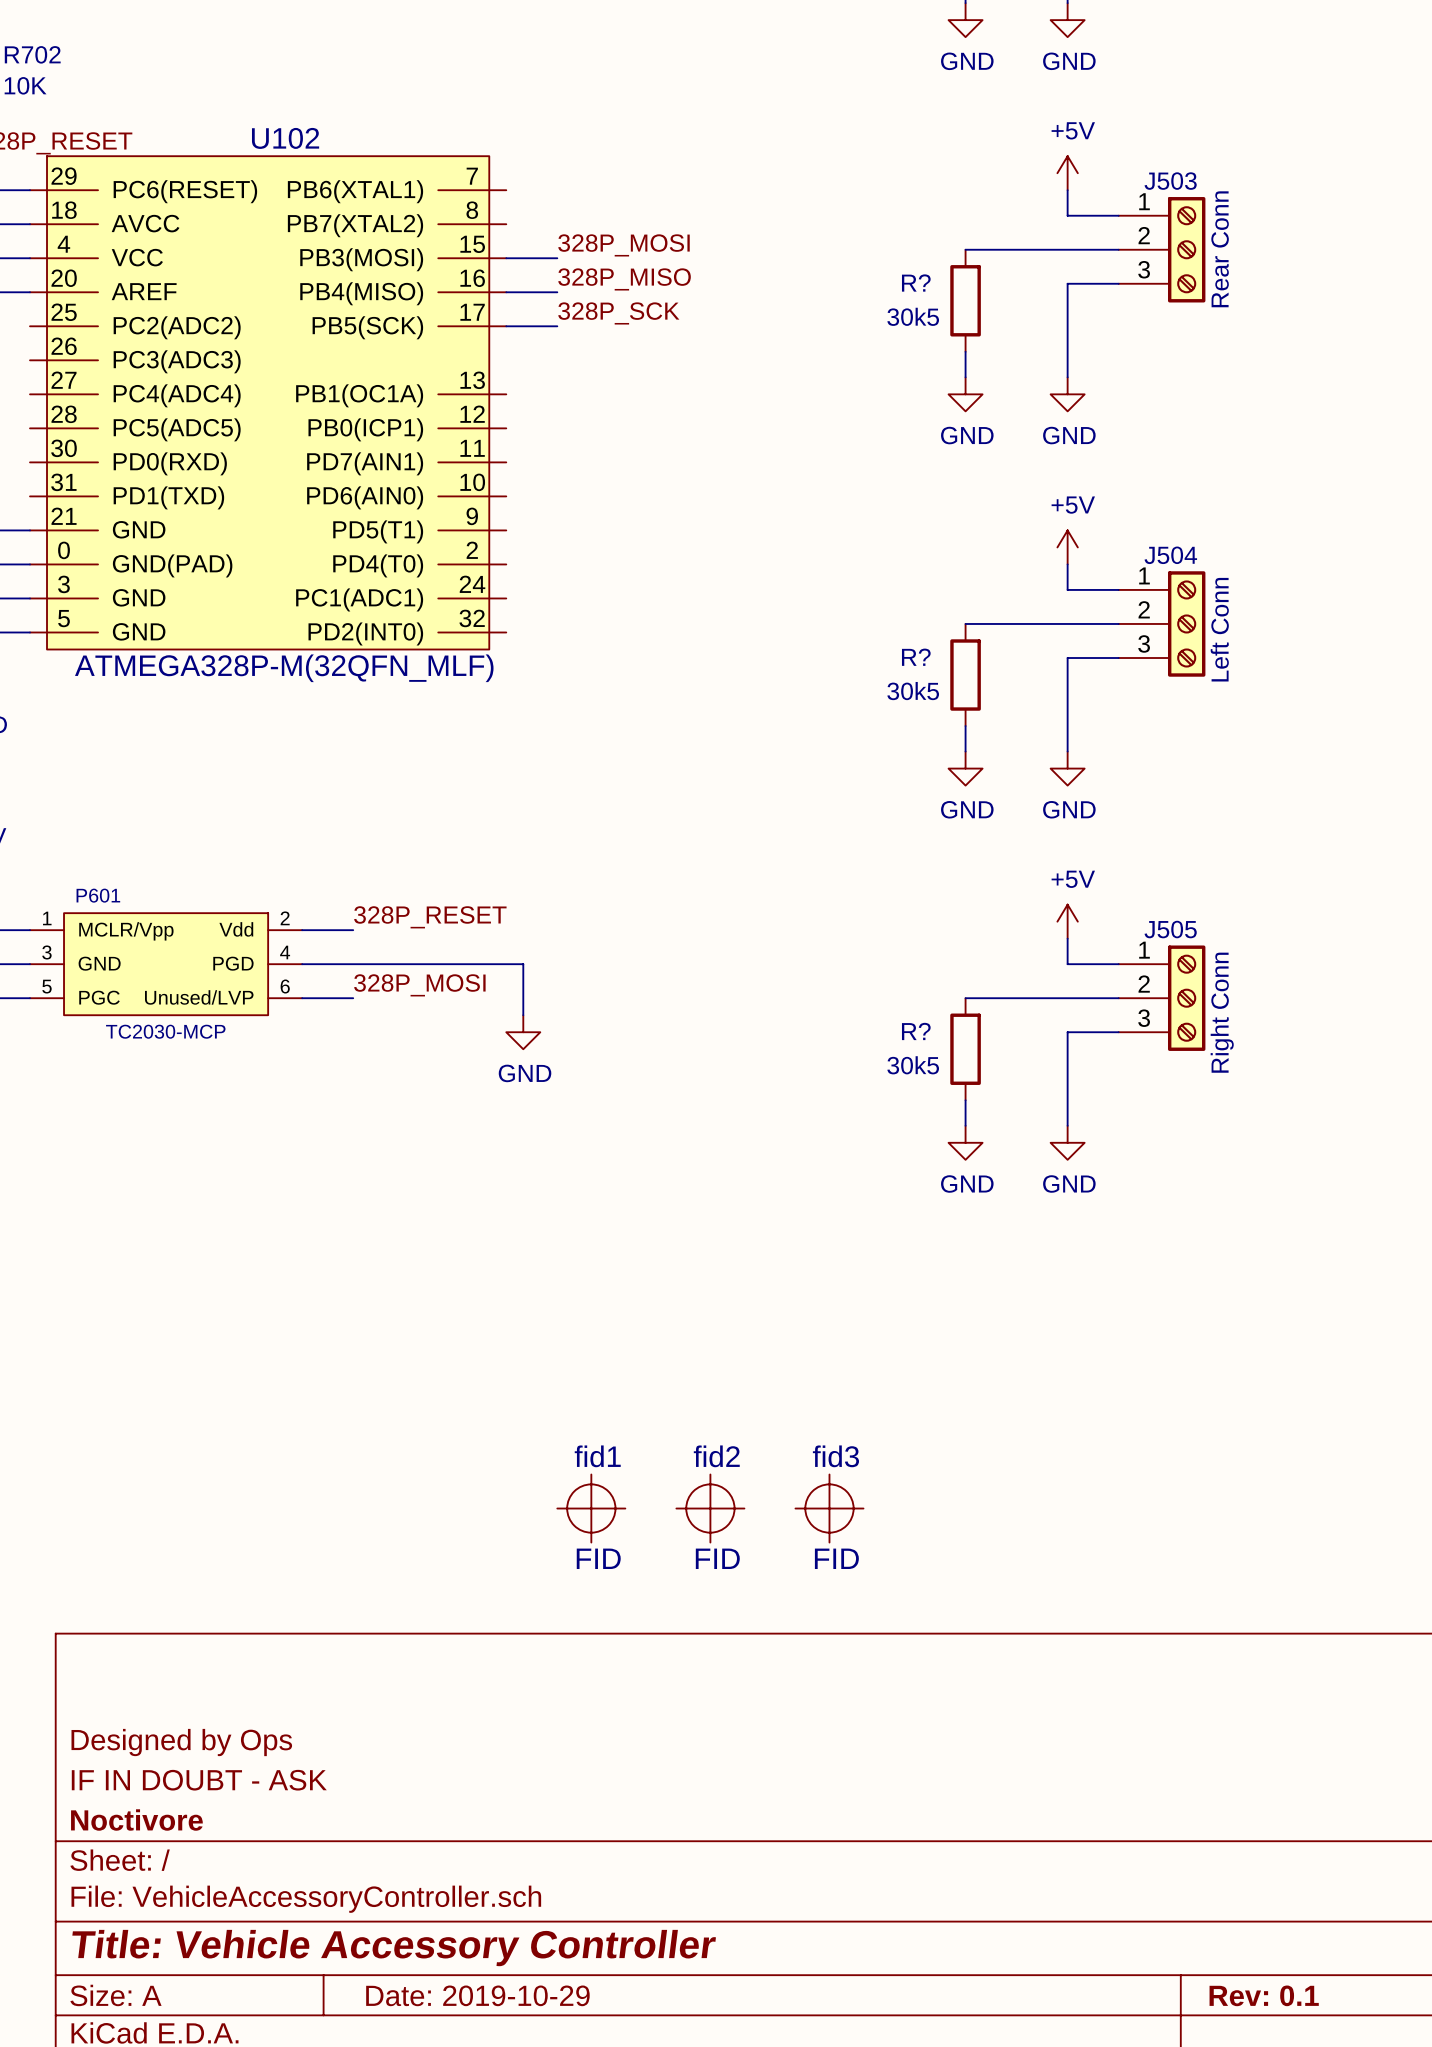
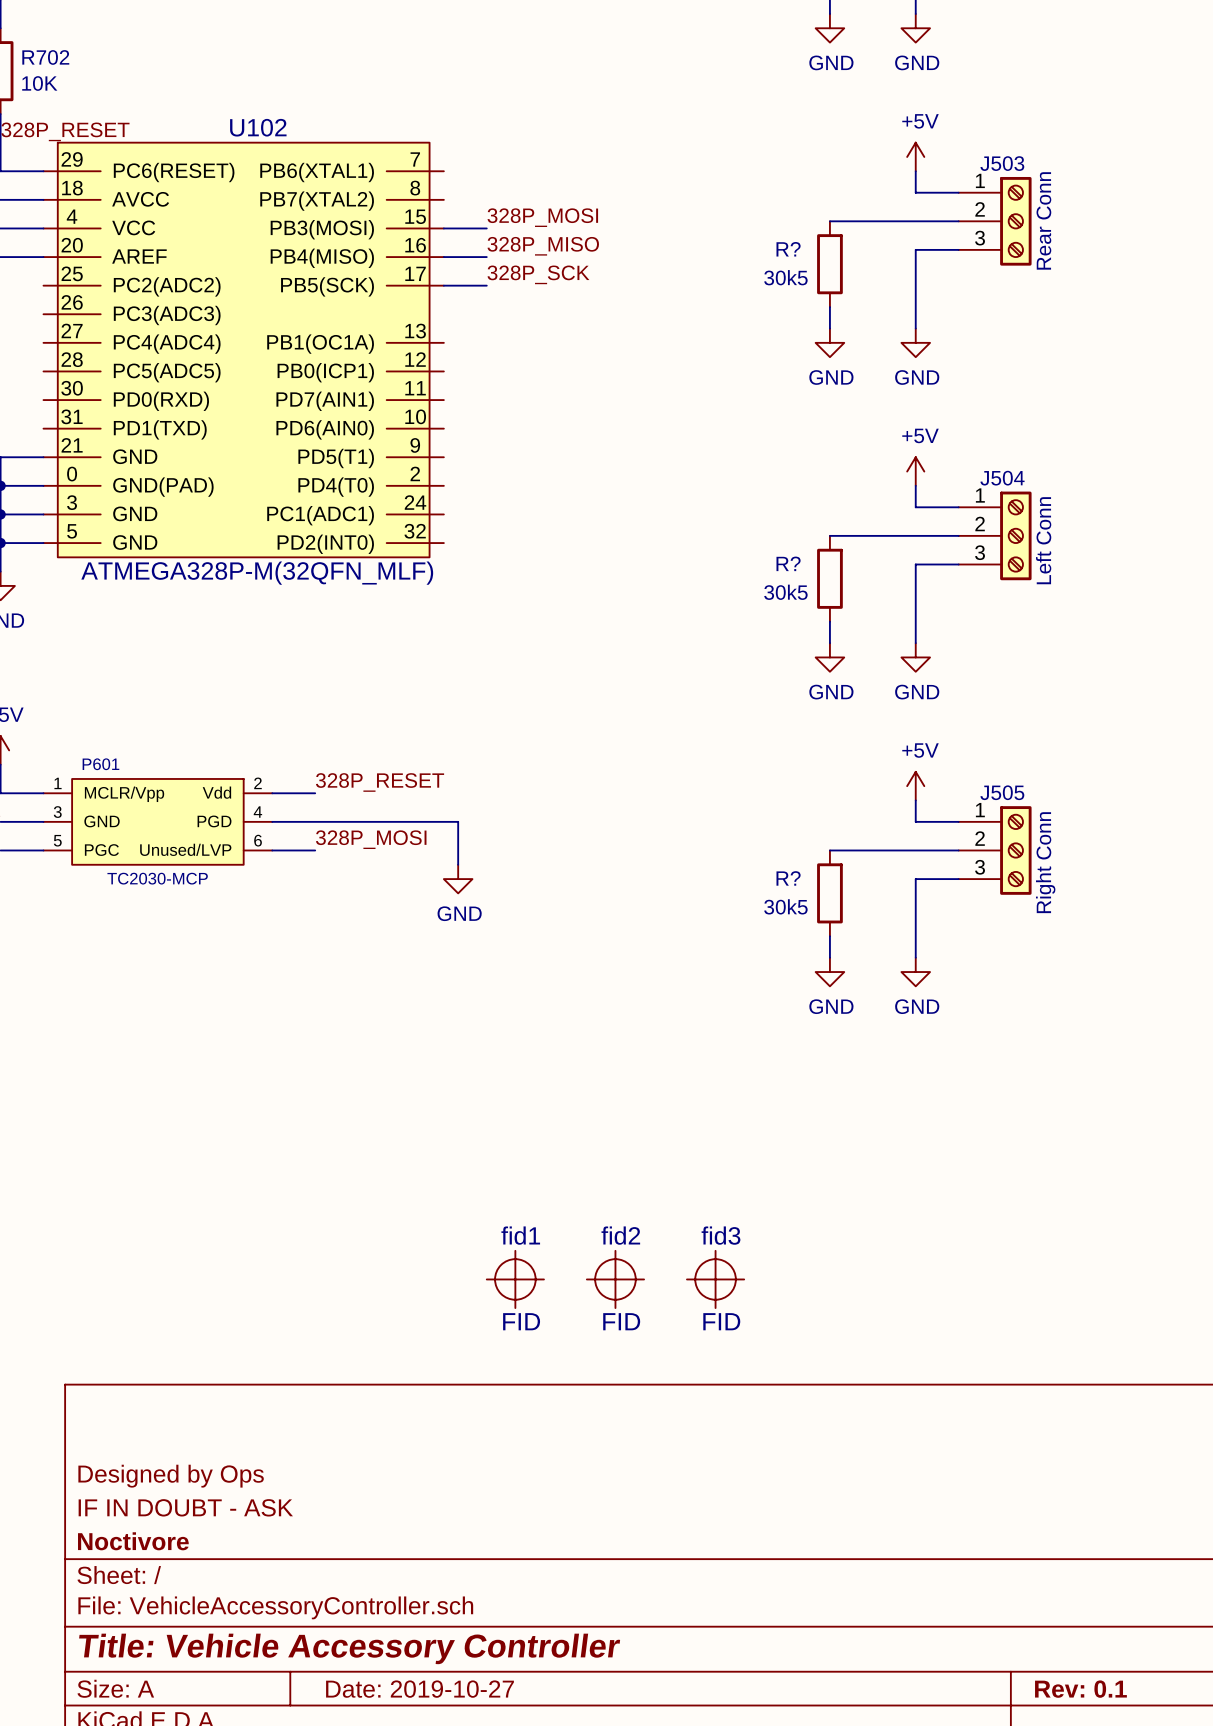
title block: Date: 2019-10-29 (477, 1995) -> Date: 2019-10-27 (420, 1689)

